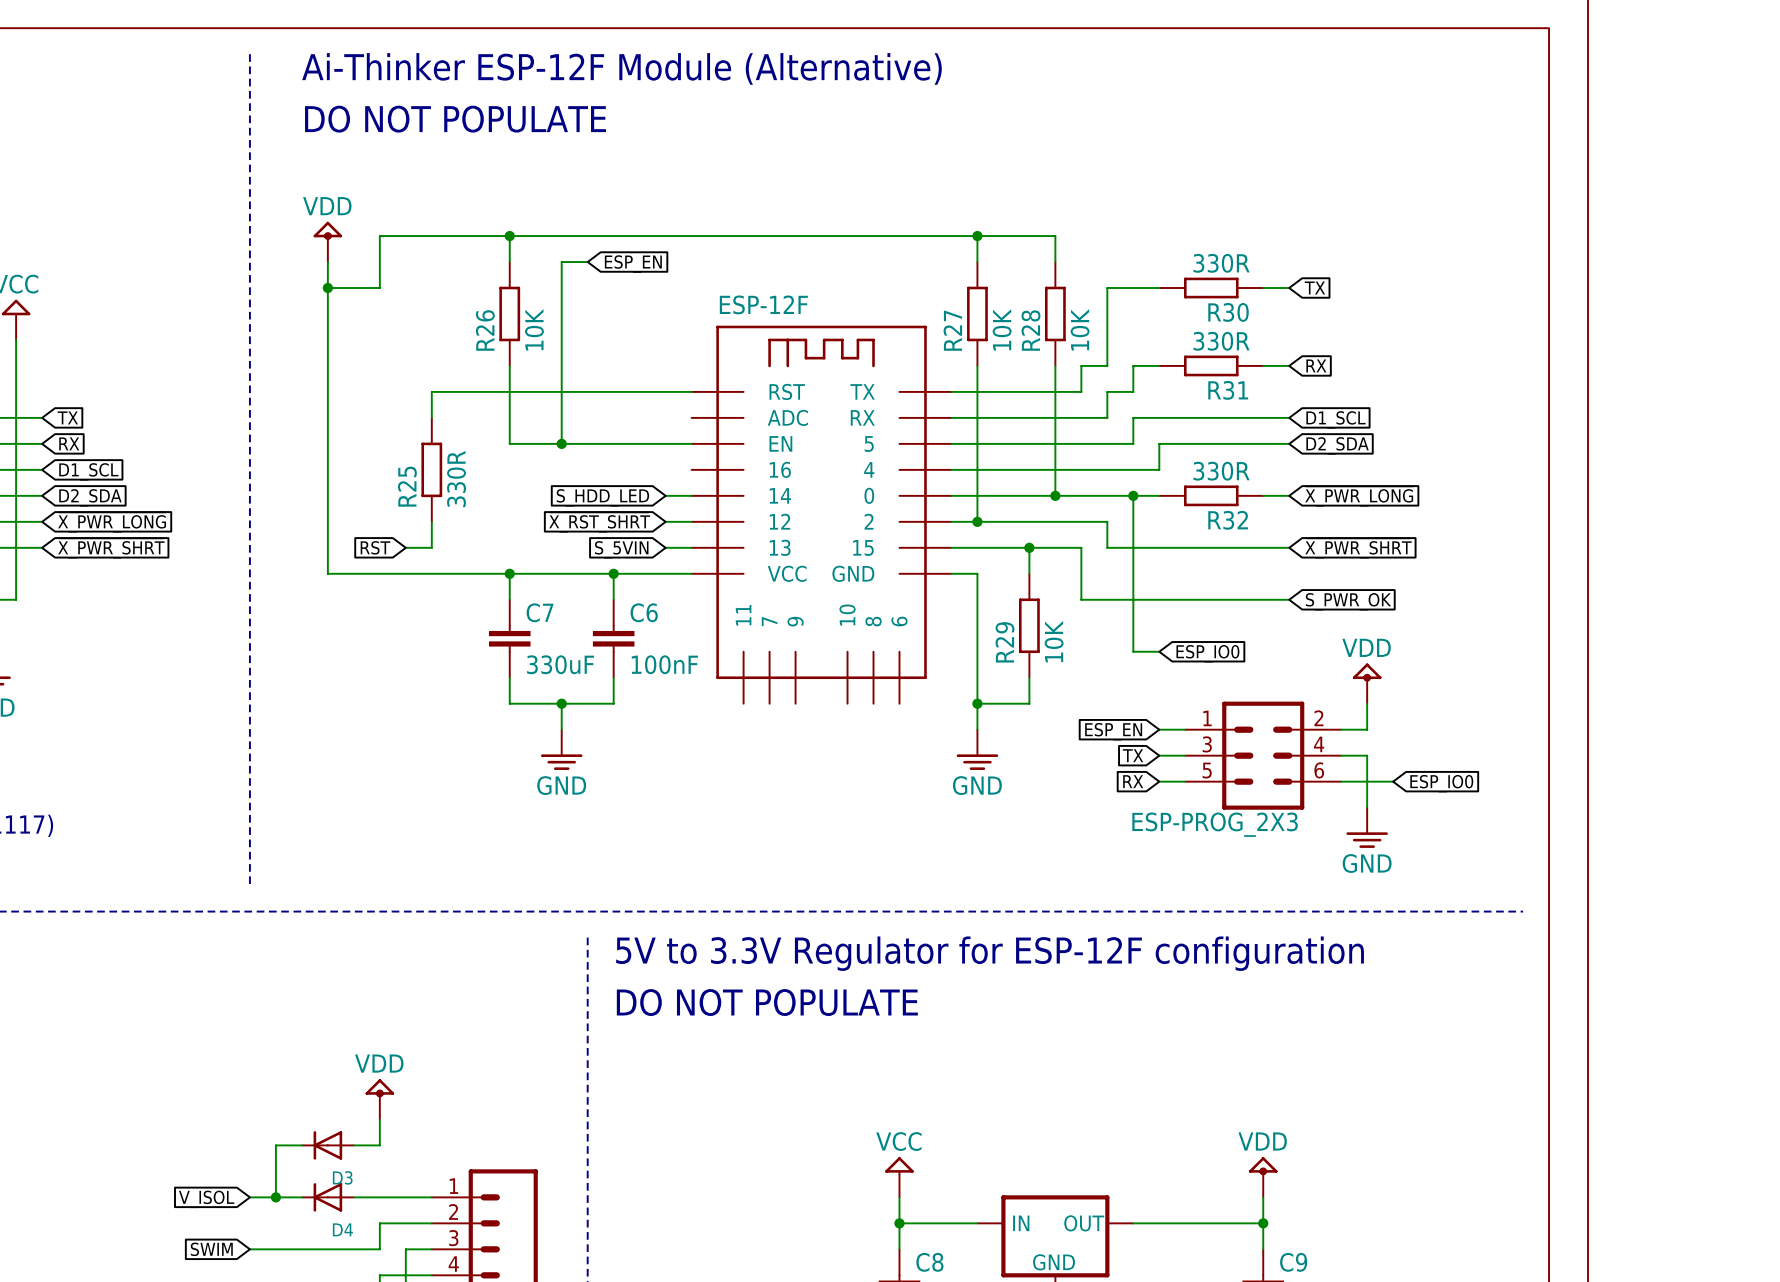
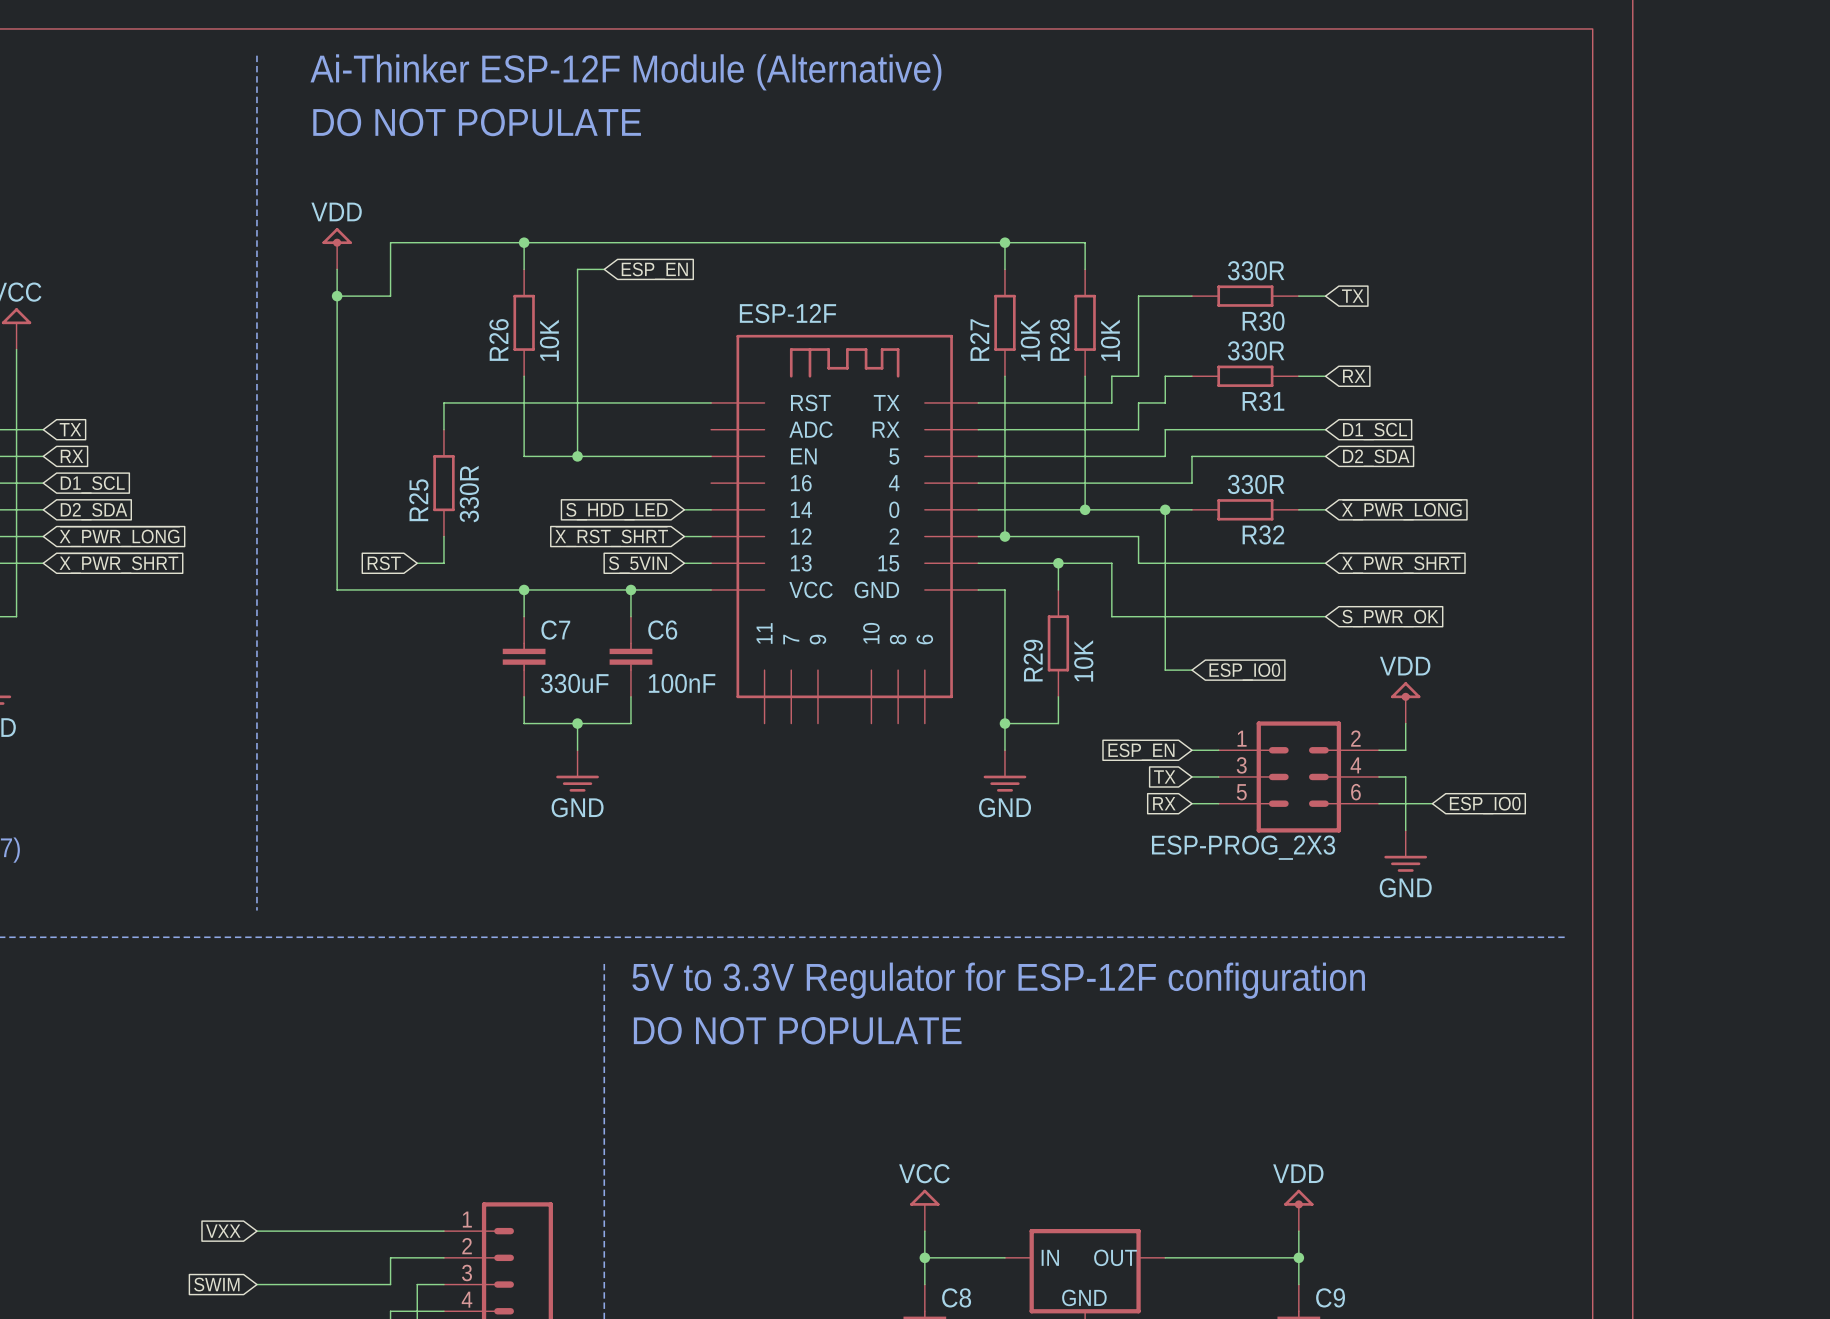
power symbol: VDD (379, 1099) -> none
wire: (379, 1119) (379, 1145) (353, 1145) -> none
wire: (301, 1145) (275, 1145) (275, 1197) -> none
D3: (327, 1145) -> none
junction: (275, 1197) -> none
D4: (327, 1197) -> none
global label: V_ISOL (206, 1199) -> VXX (223, 1231)

